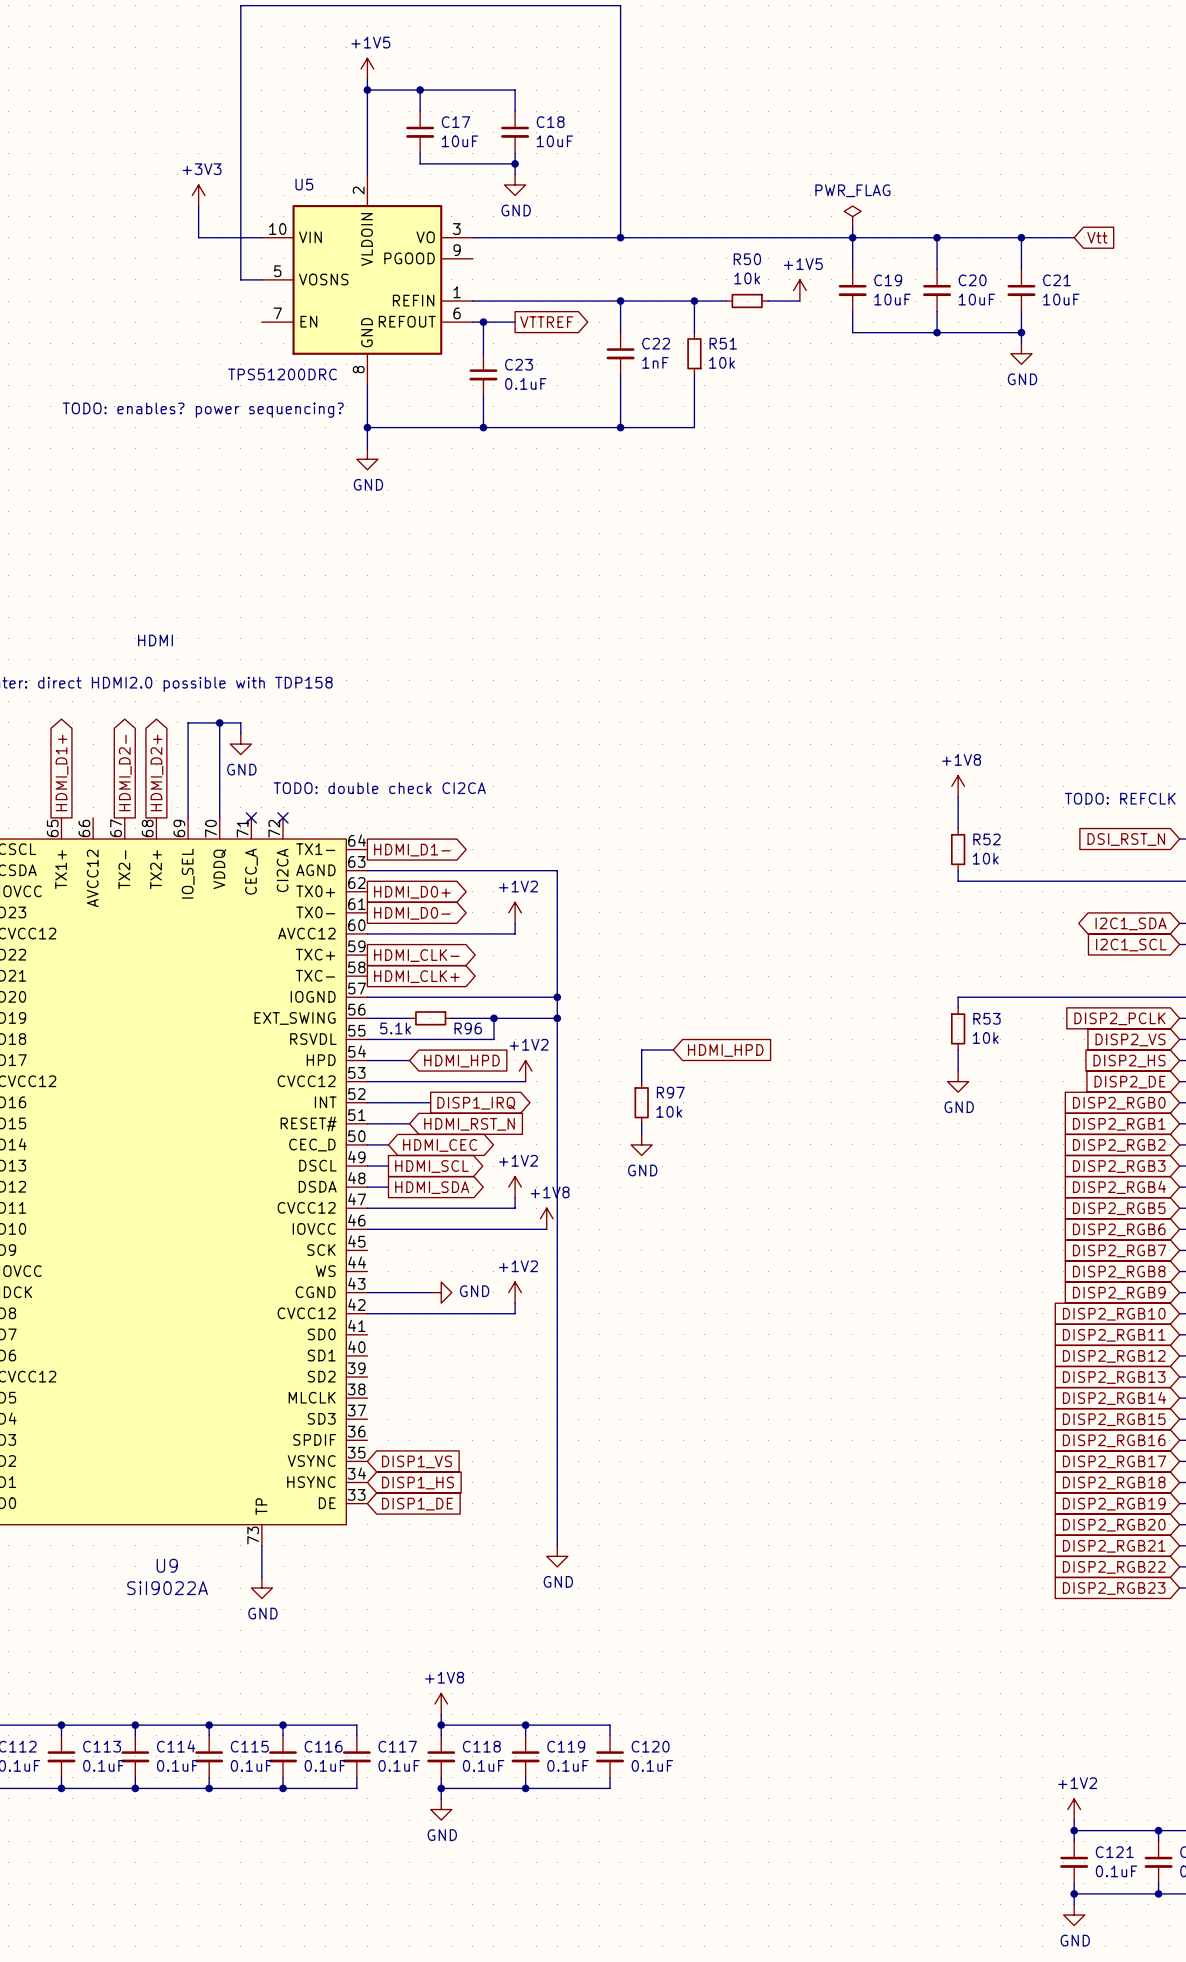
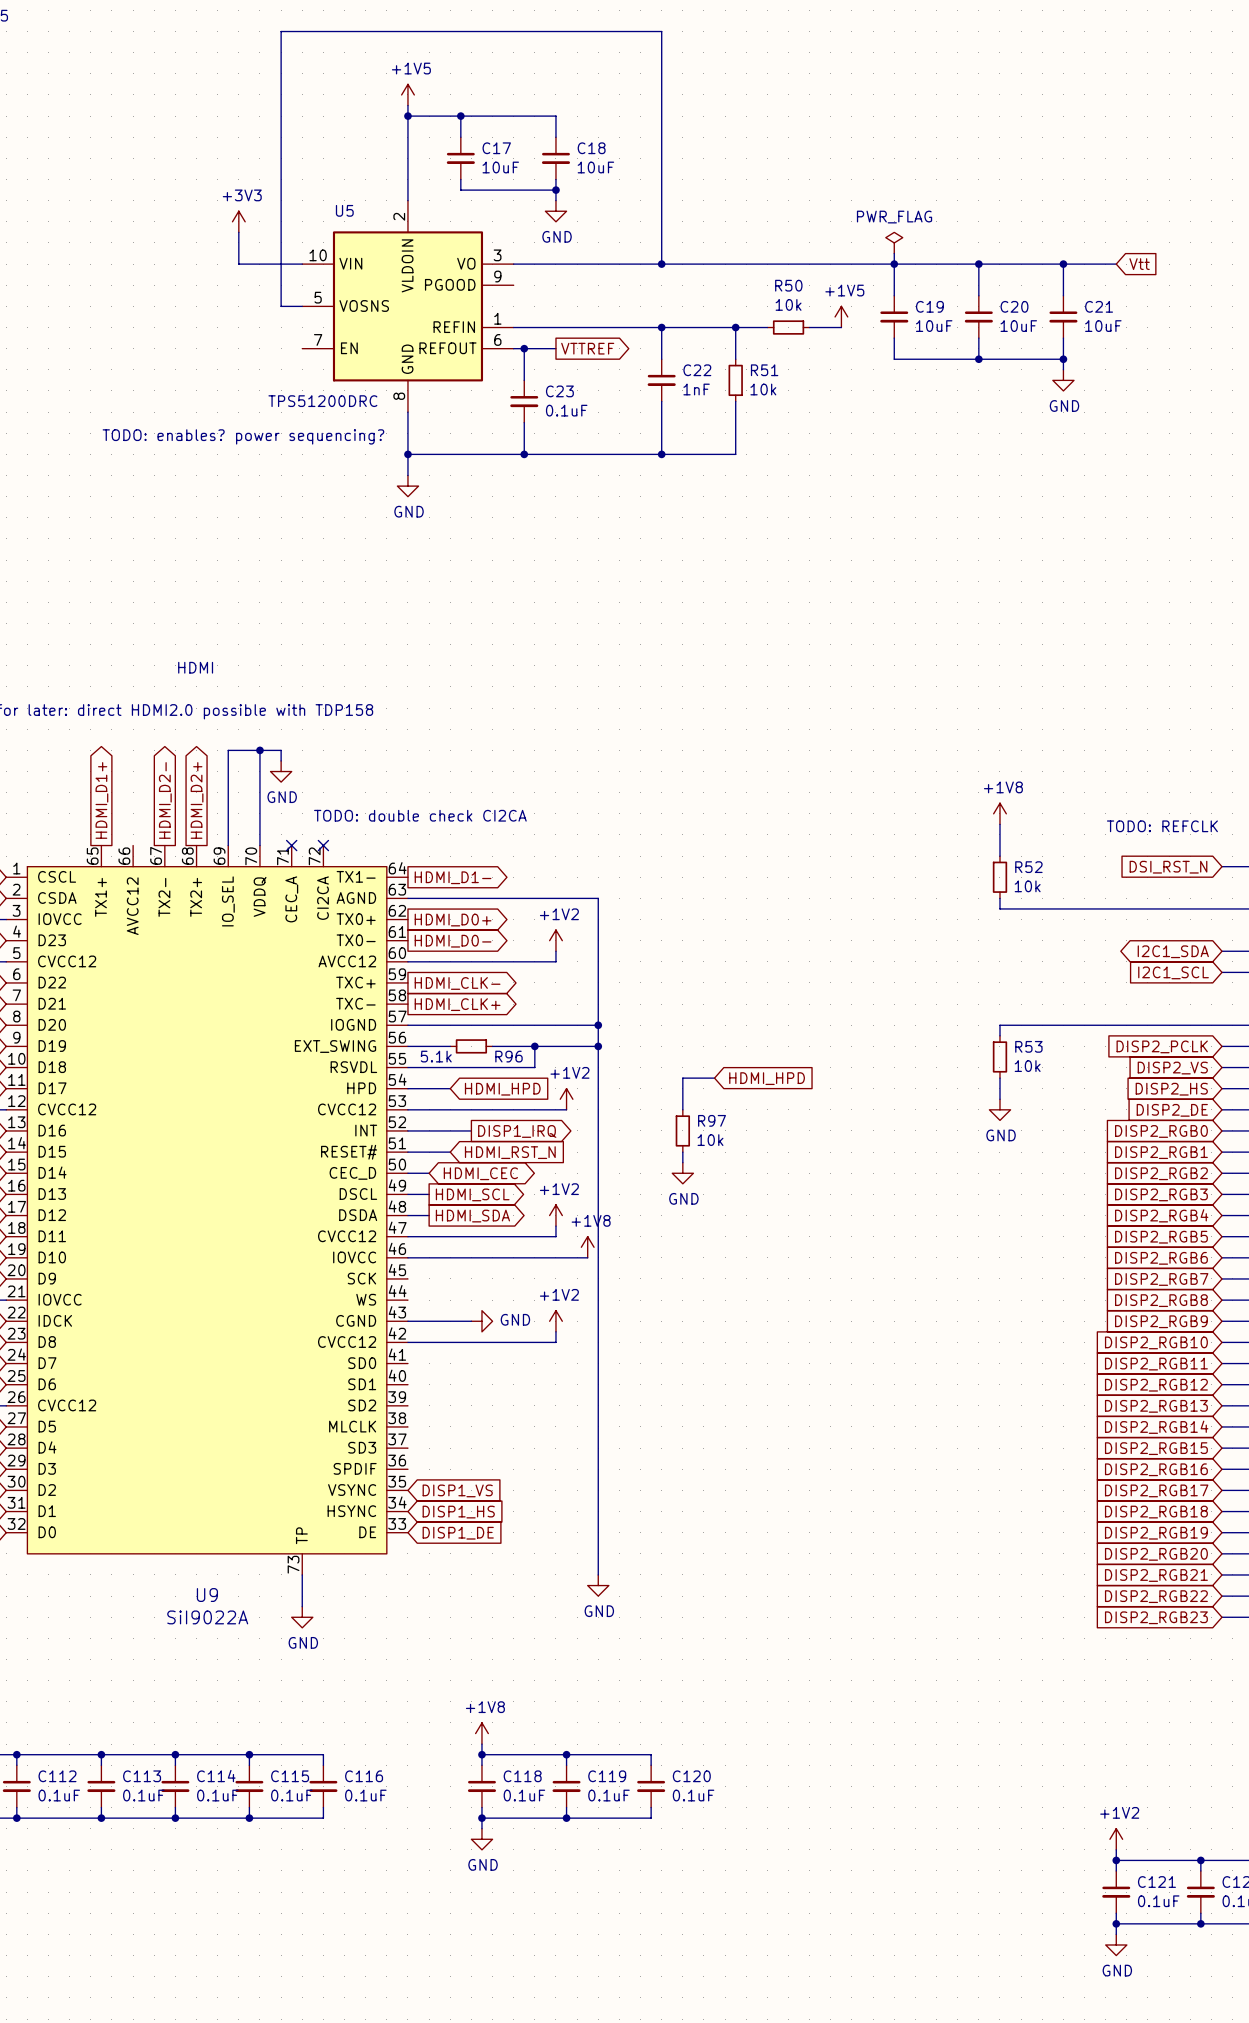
wire: (283, 1725) (356, 1725) (356, 1735) -> none
junction: (283, 1725) -> none
C117: 0.1uF (356, 1756) -> none
wire: (356, 1777) (356, 1788) (283, 1788) -> none
junction: (283, 1788) -> none

